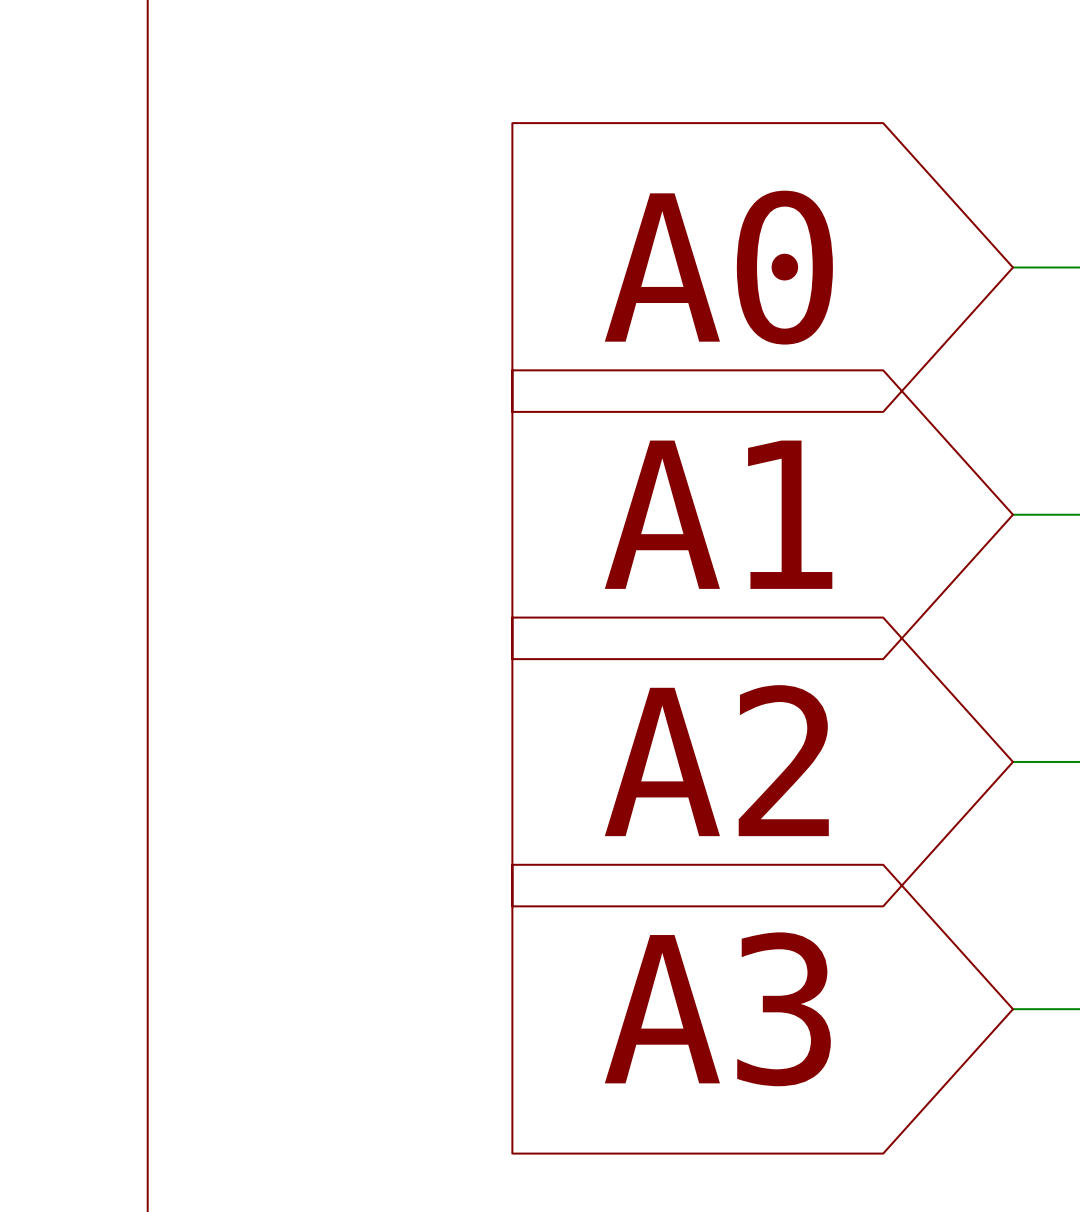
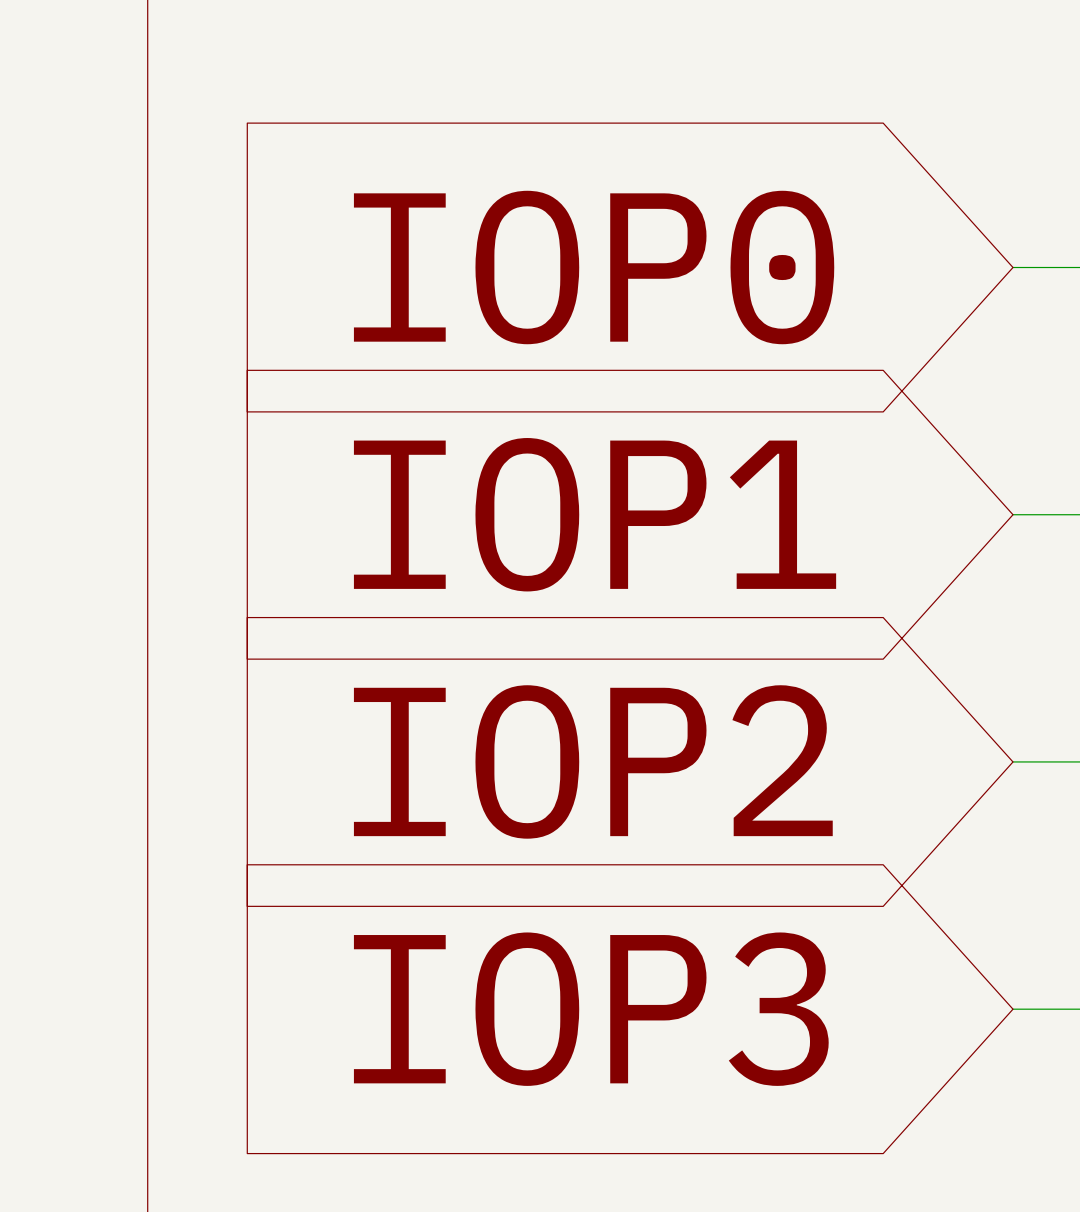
global label: A0 (718, 267) -> IOP0 (594, 267)
global label: A1 (718, 514) -> IOP1 (595, 514)
global label: A2 (716, 760) -> IOP2 (593, 761)
global label: A3 (717, 1009) -> IOP3 (591, 1009)

